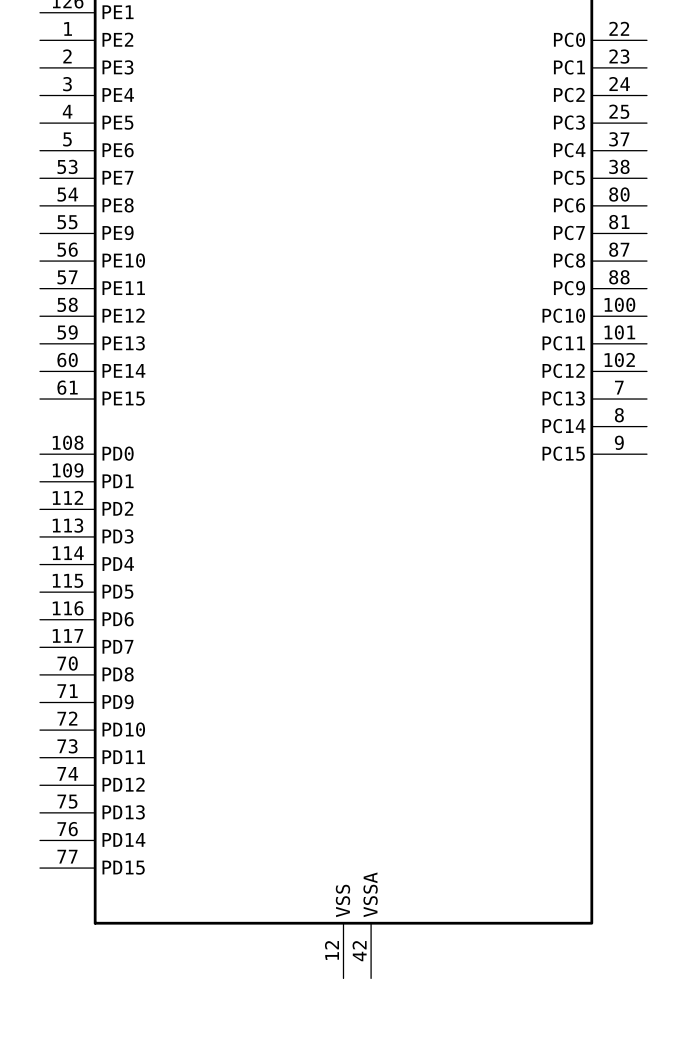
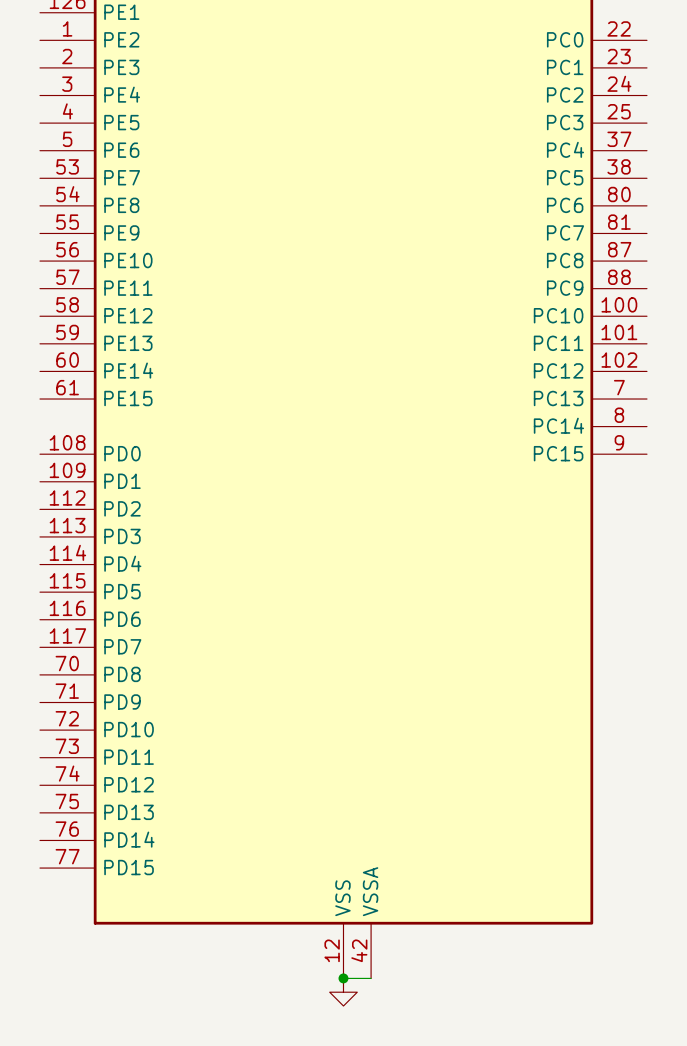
wire: none -> (343, 978) (371, 978)
junction: none -> (343, 978)
power symbol: none -> (343, 992)

